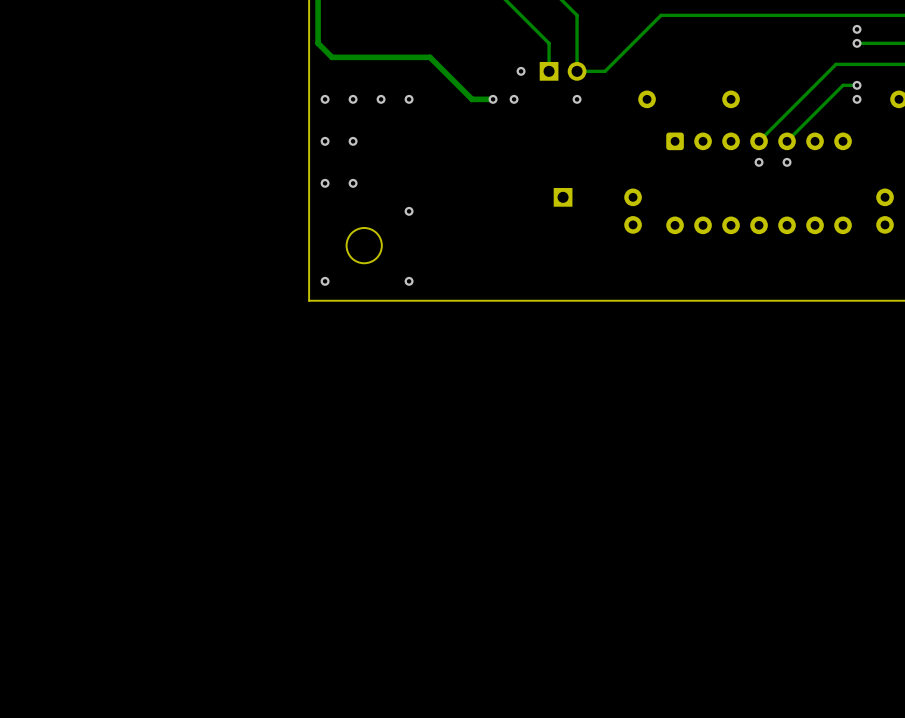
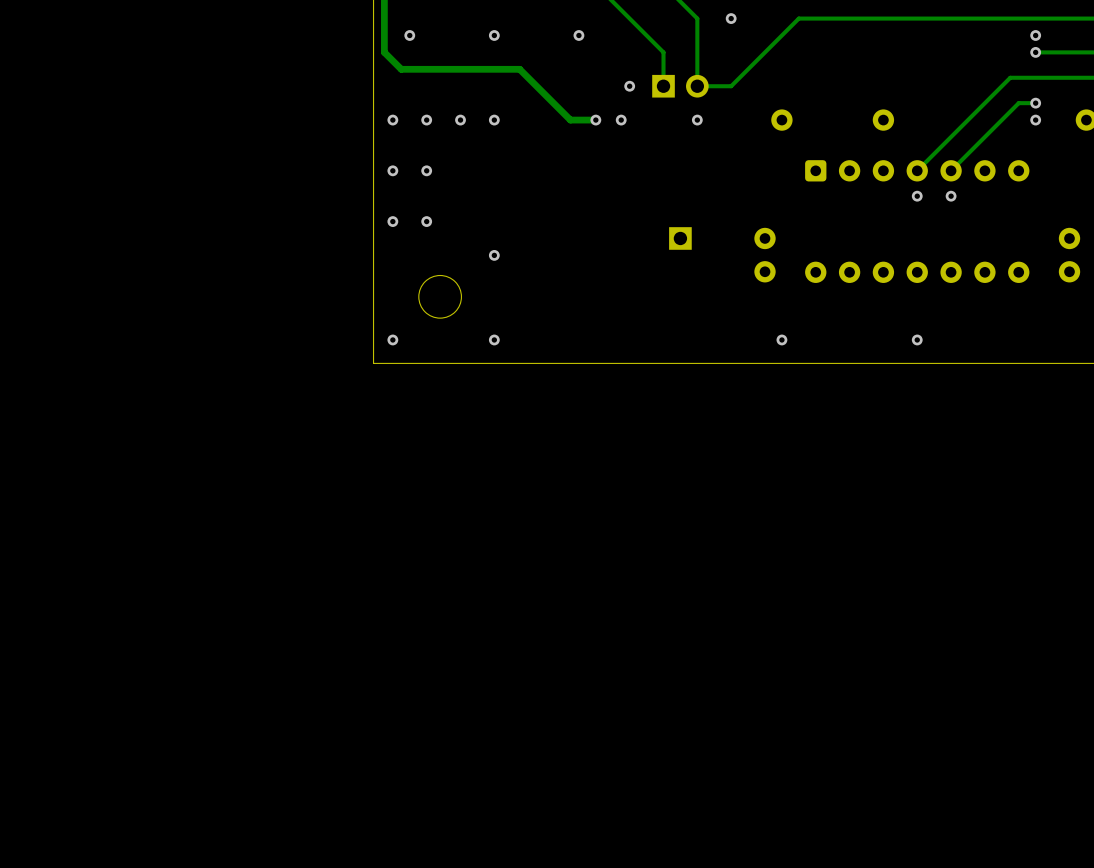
via: none -> (731, 18)
via: none -> (409, 35)
via: none -> (494, 35)
via: none -> (578, 35)
via: none -> (781, 339)
via: none -> (917, 339)

